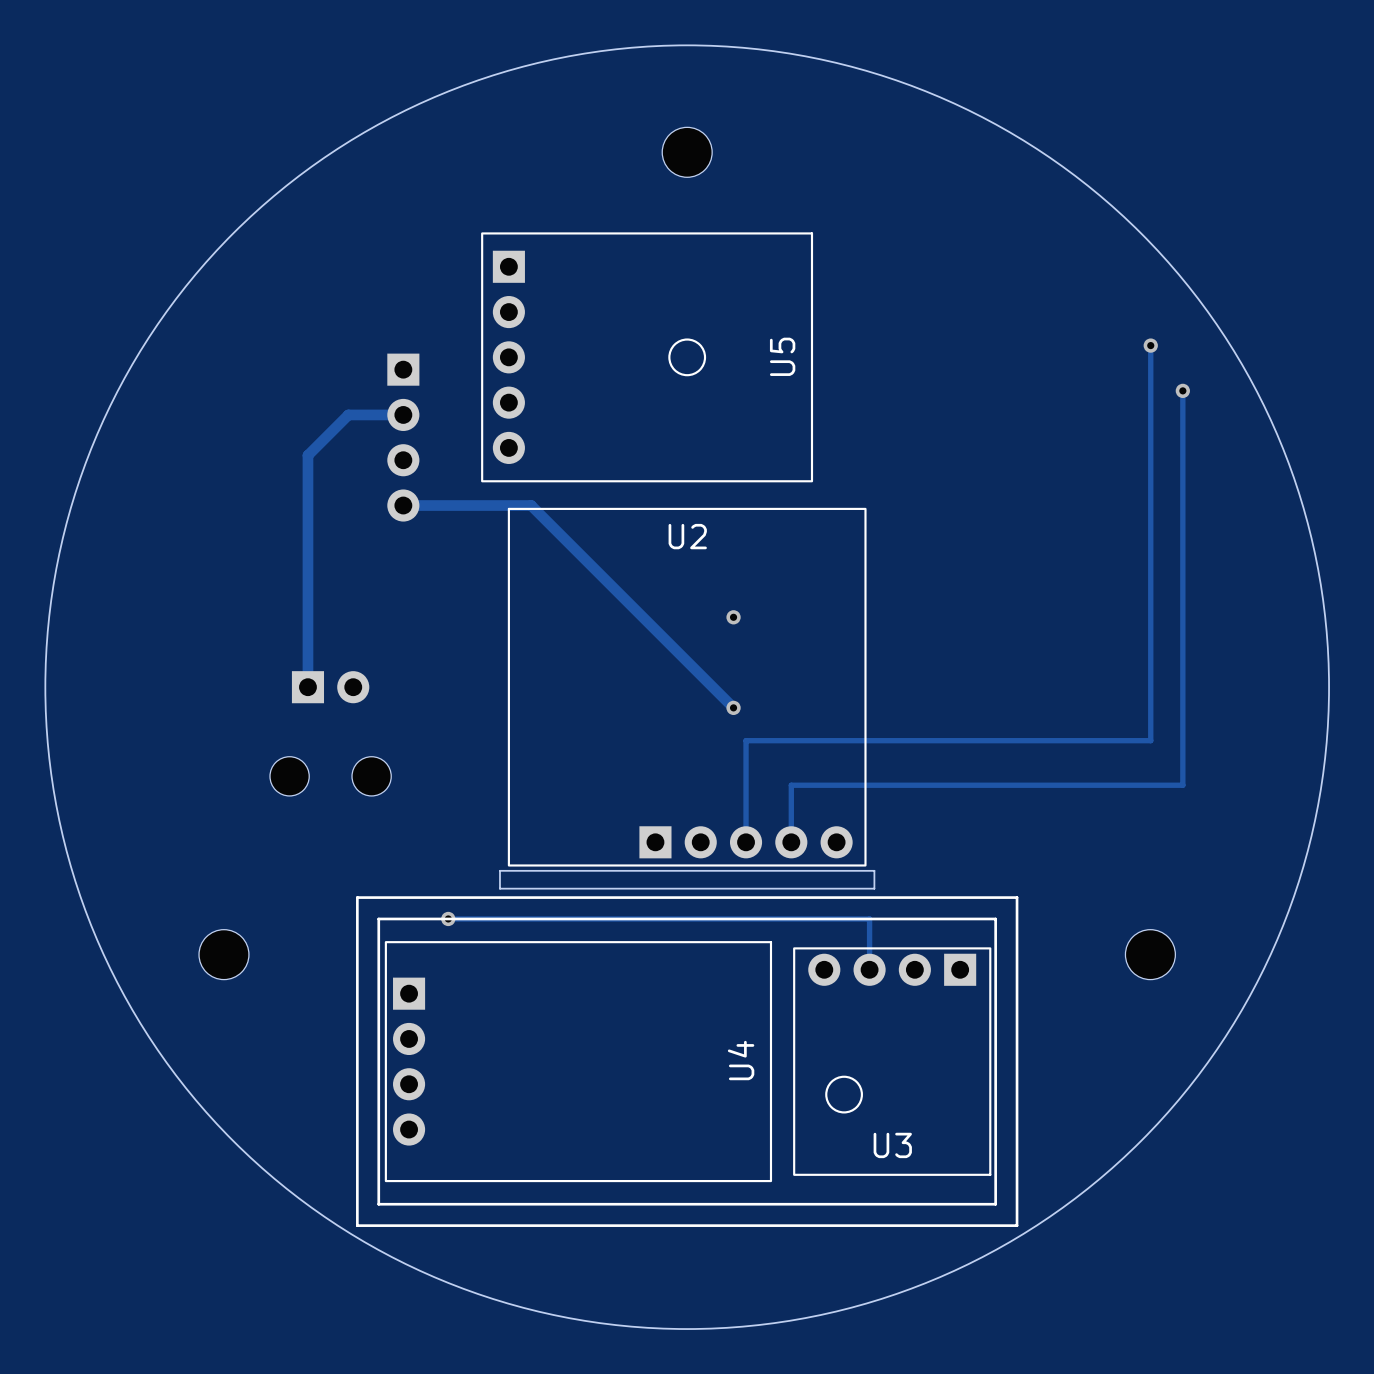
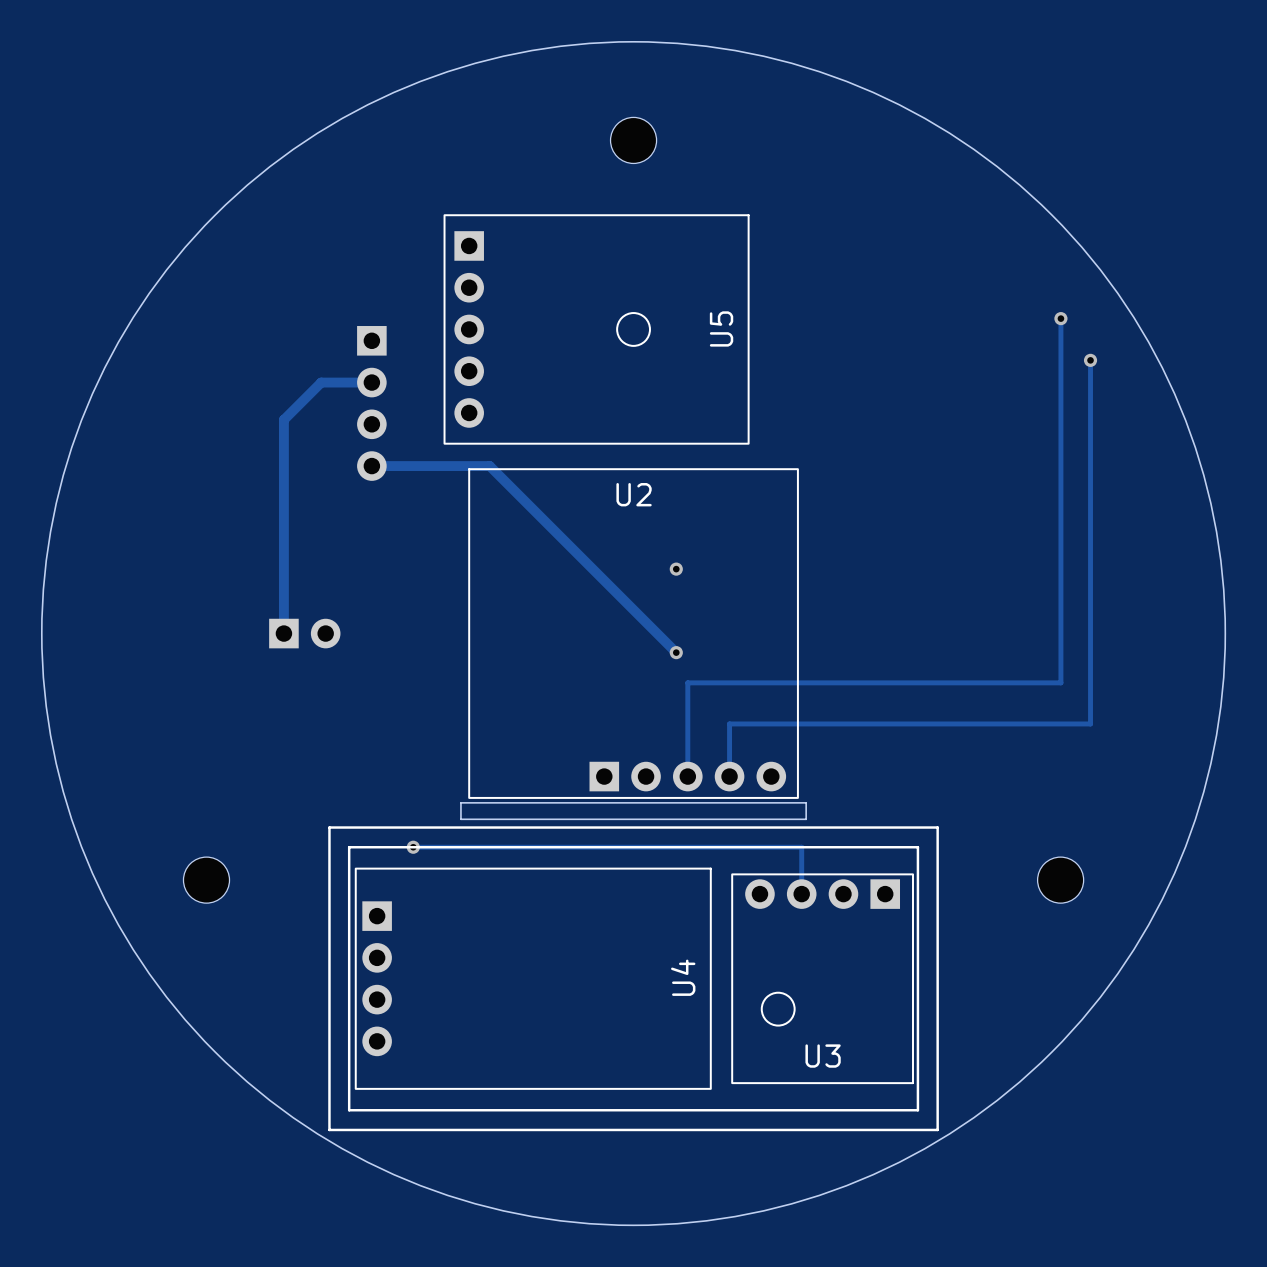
part: (289, 776) -> none
part: (371, 776) -> none

